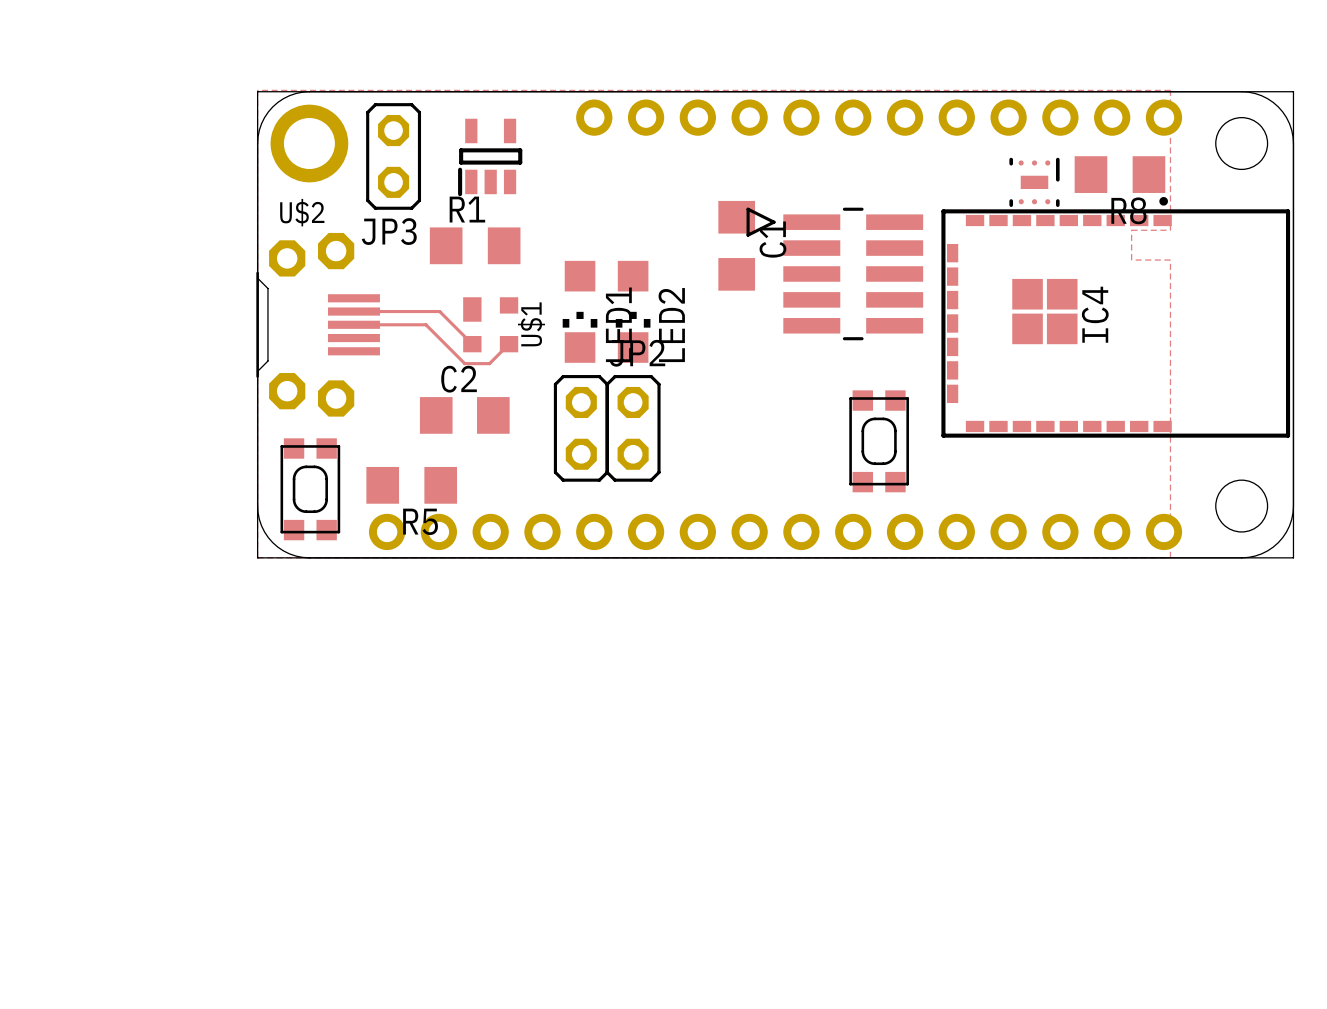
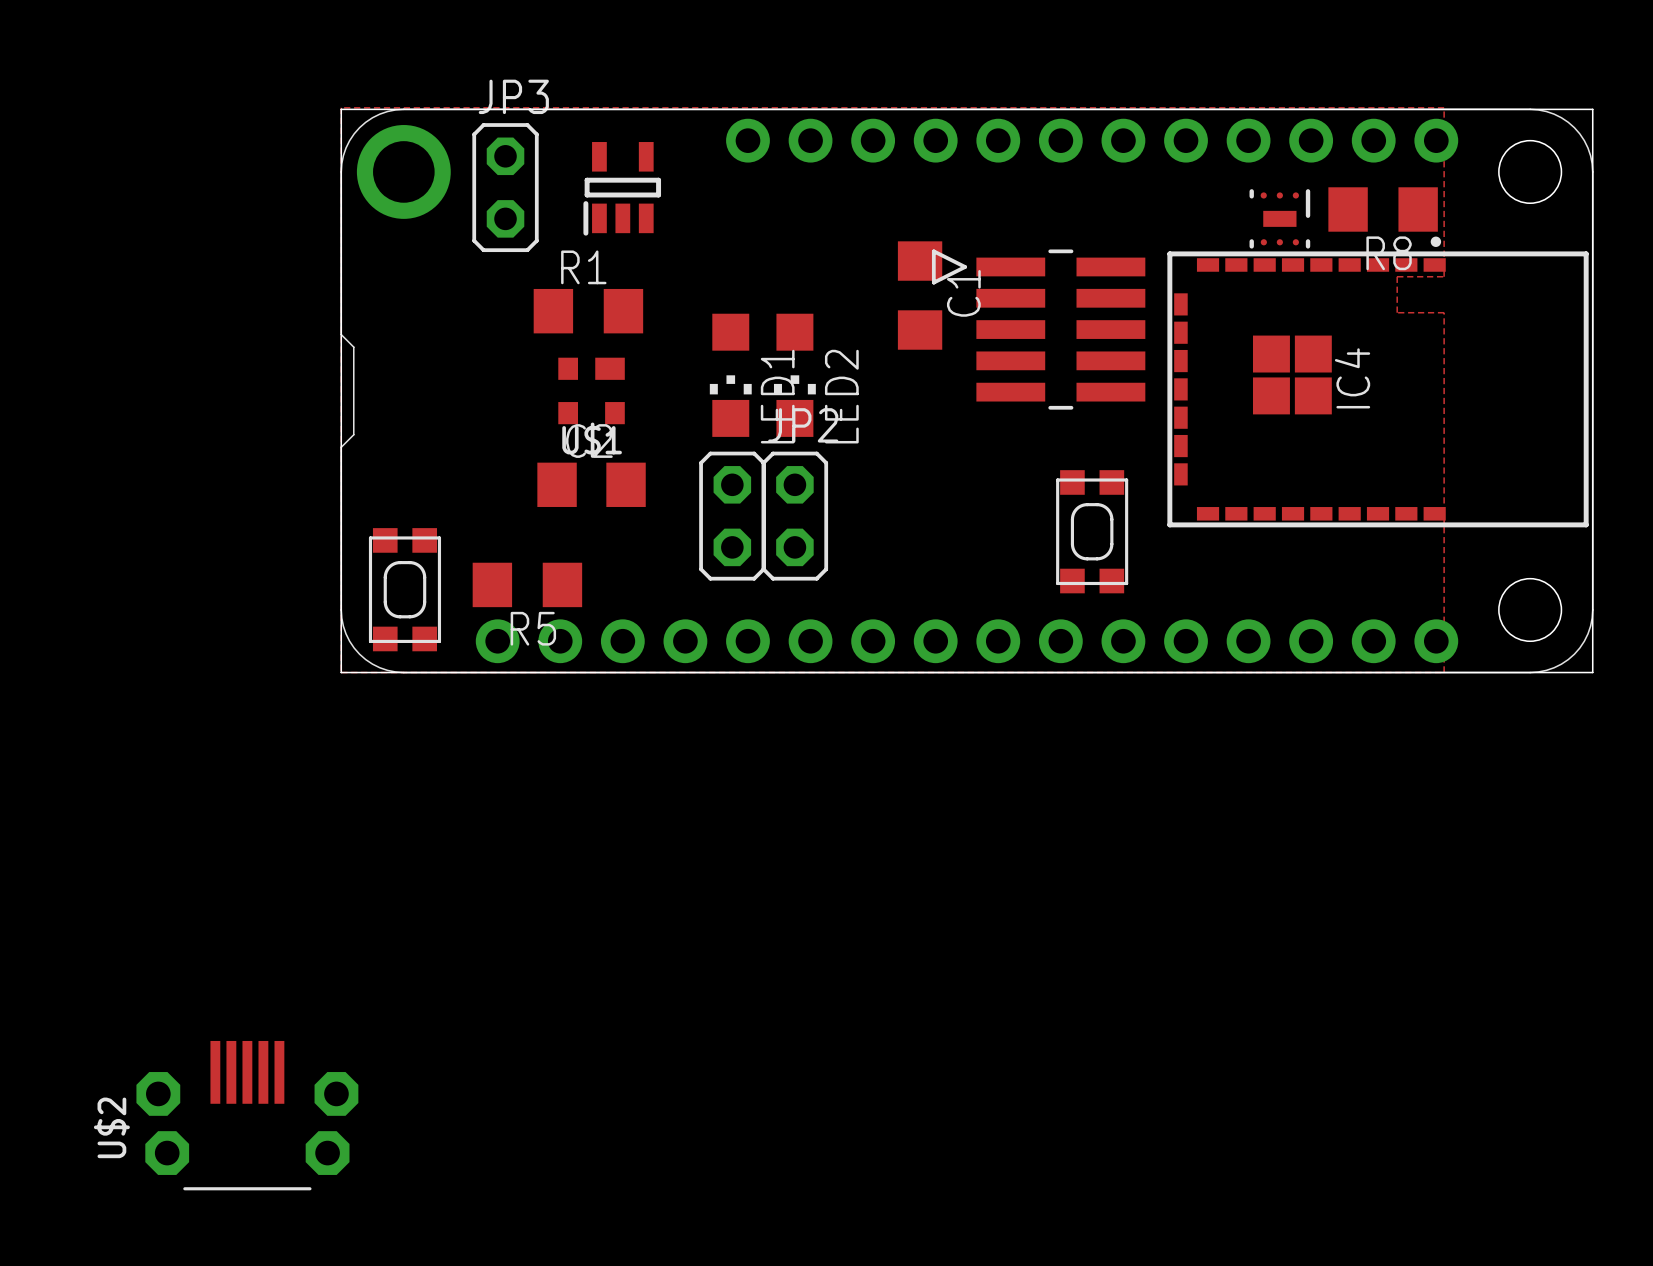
JP3 name position: JP3 (389, 231) -> JP3 (513, 96)
R1 position: (475, 245) -> (588, 311)
track: (353, 311) (439, 311) (472, 344) -> none
U$2 rotation: 0° (318, 324) -> 90° counterclockwise (247, 1115)
U$2 position: (318, 324) -> (247, 1115)
track: (353, 324) (425, 324) (464, 363) (489, 363) (509, 344) -> none
U$1 rotation: 0° (490, 324) -> 90° clockwise (591, 390)
C2 position: (464, 415) -> (591, 484)

